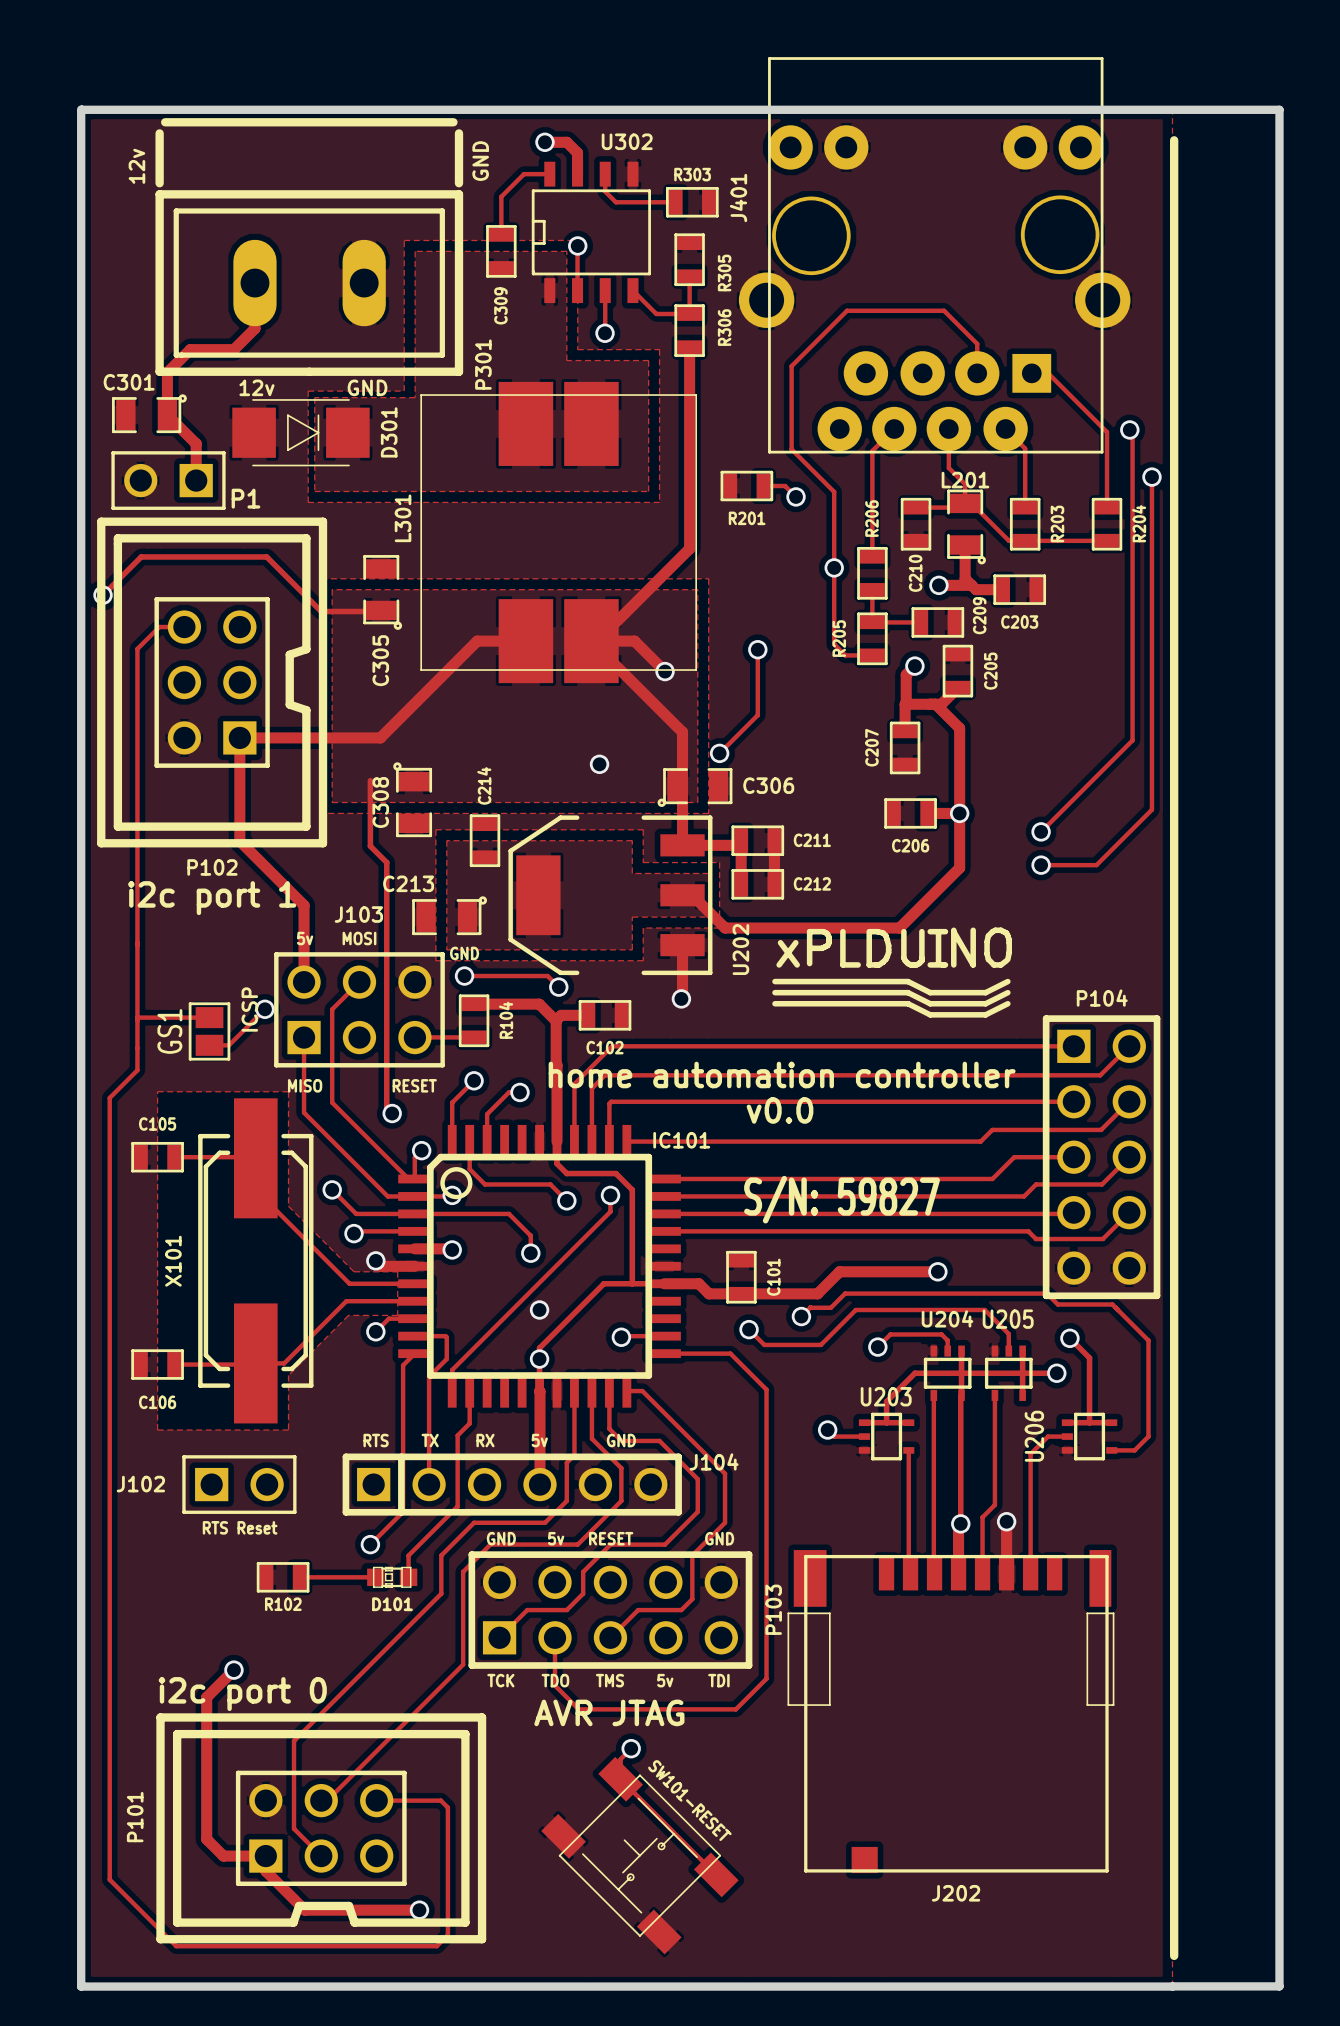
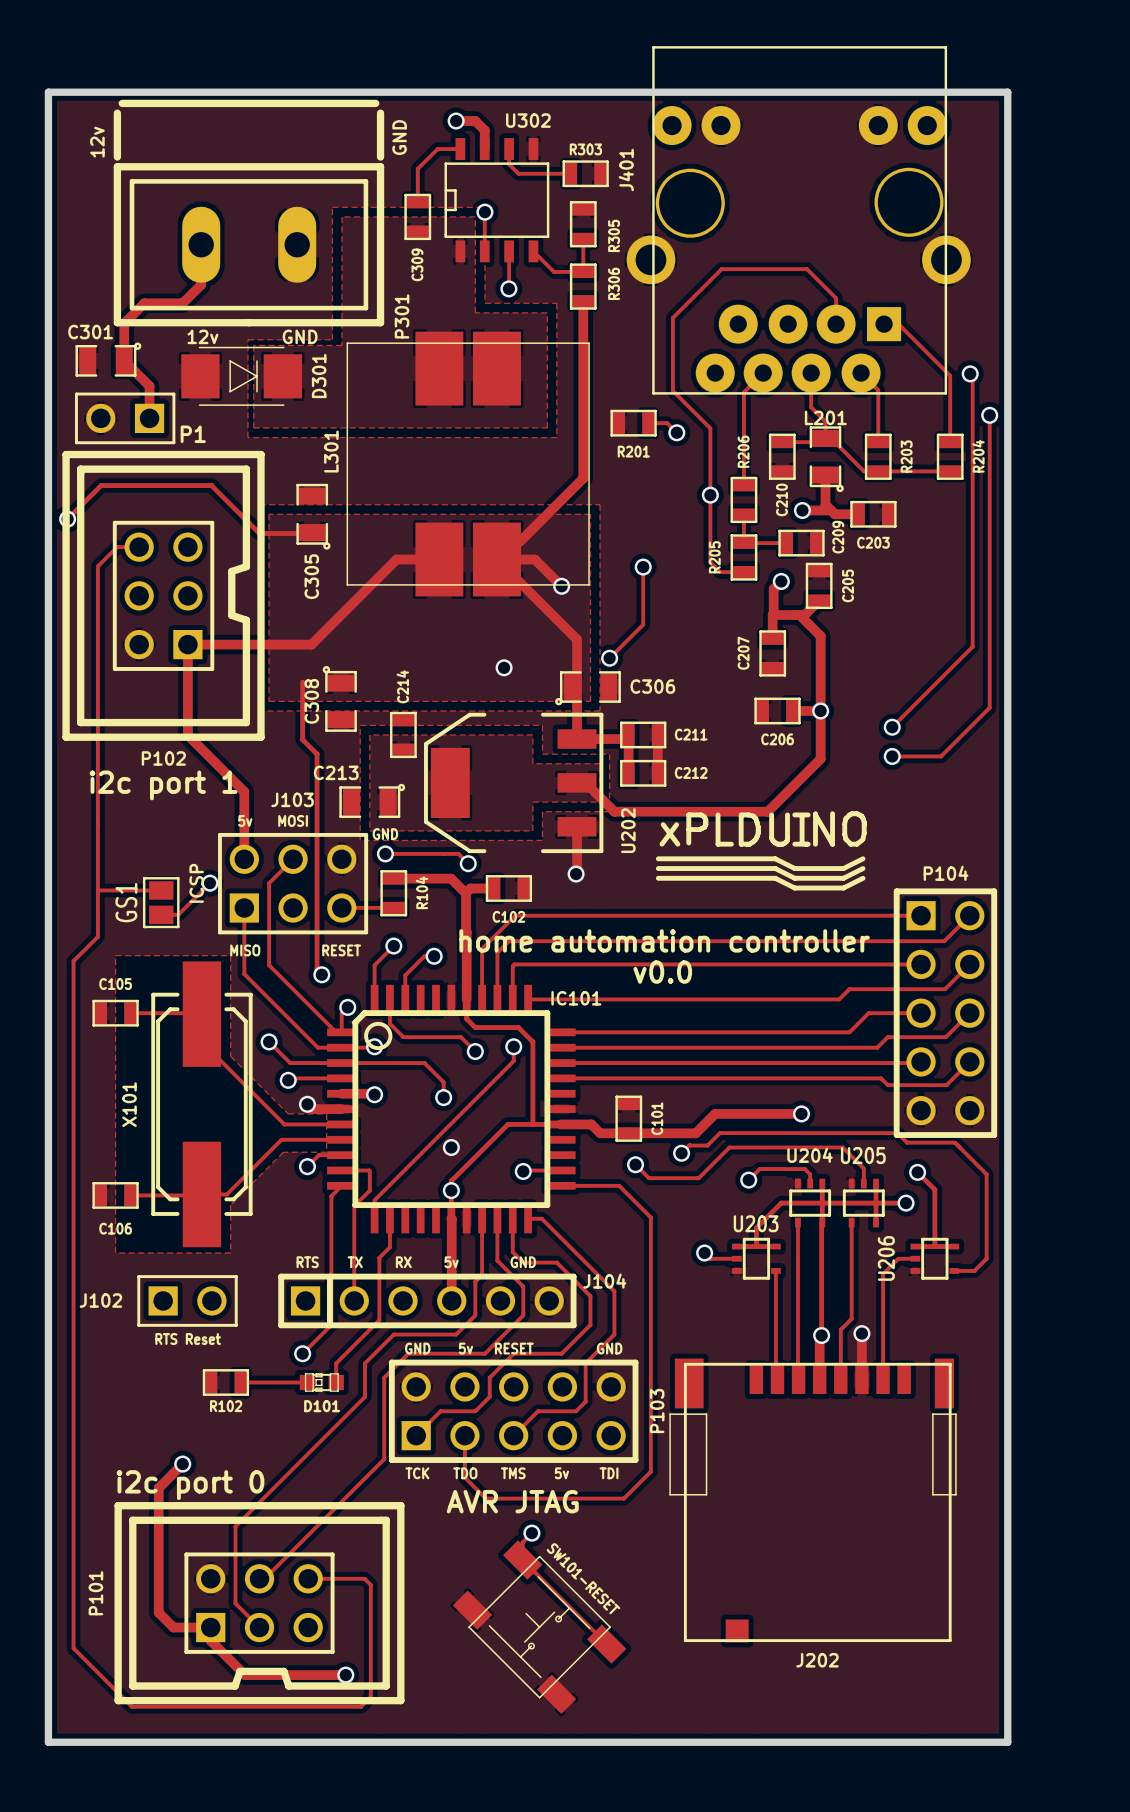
board edge: (82, 111) (1279, 109) (1279, 1986) (1172, 1986) -> (48, 92) (1007, 92) (1007, 1742)
line: (1174, 140) (1174, 1955) -> none
text: S/N: 59827 (842, 1199) -> none

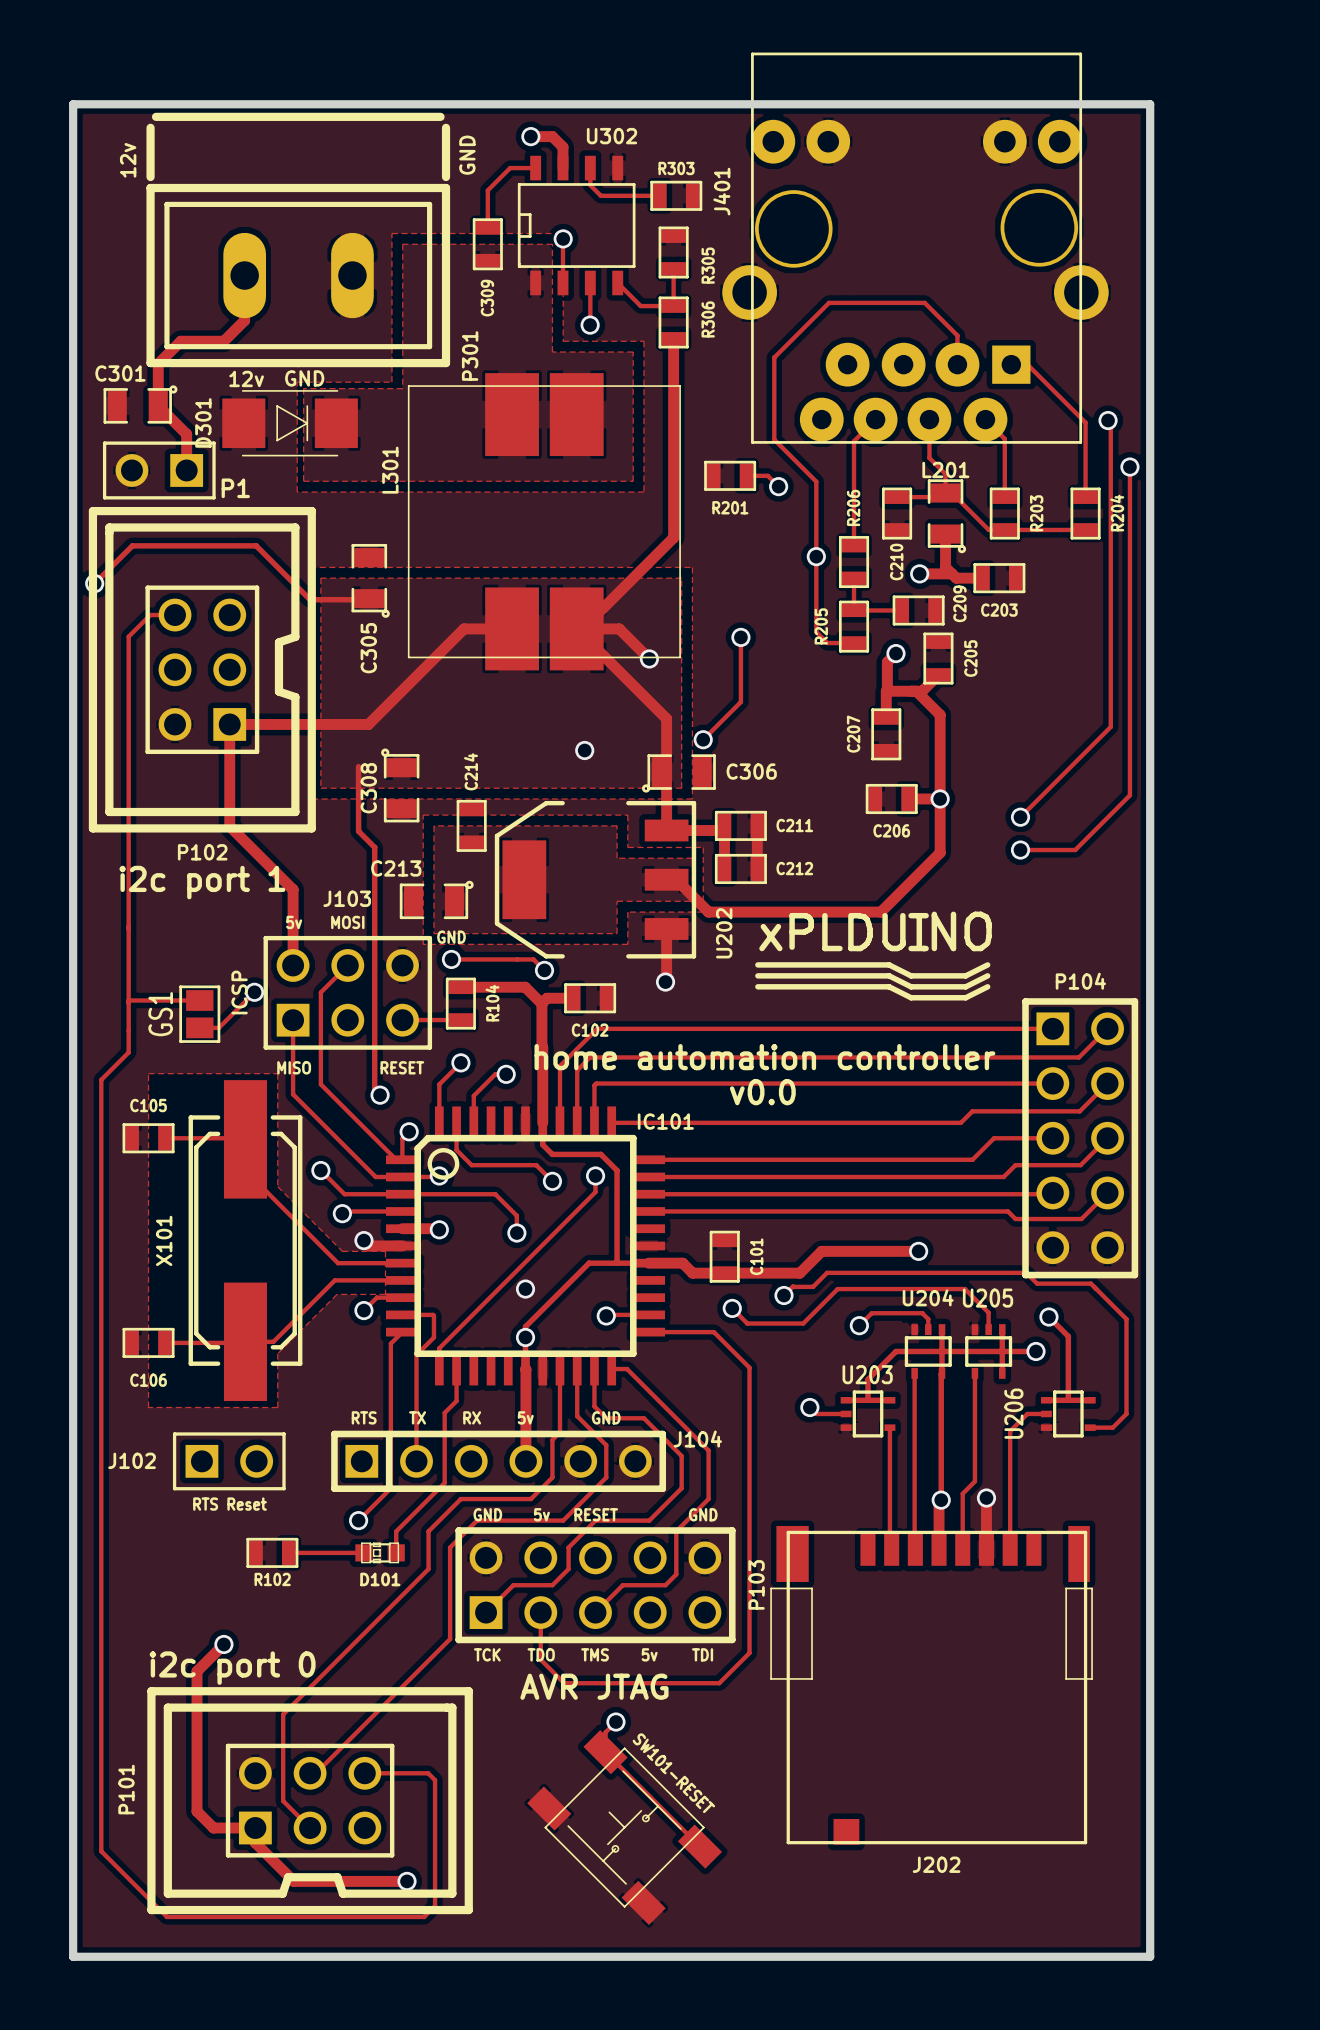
text position: GND (300, 336) -> GND (304, 378)
D301 name position: D301 (319, 376) -> D301 (203, 422)
L301 name position: L301 (331, 451) -> L301 (390, 470)

